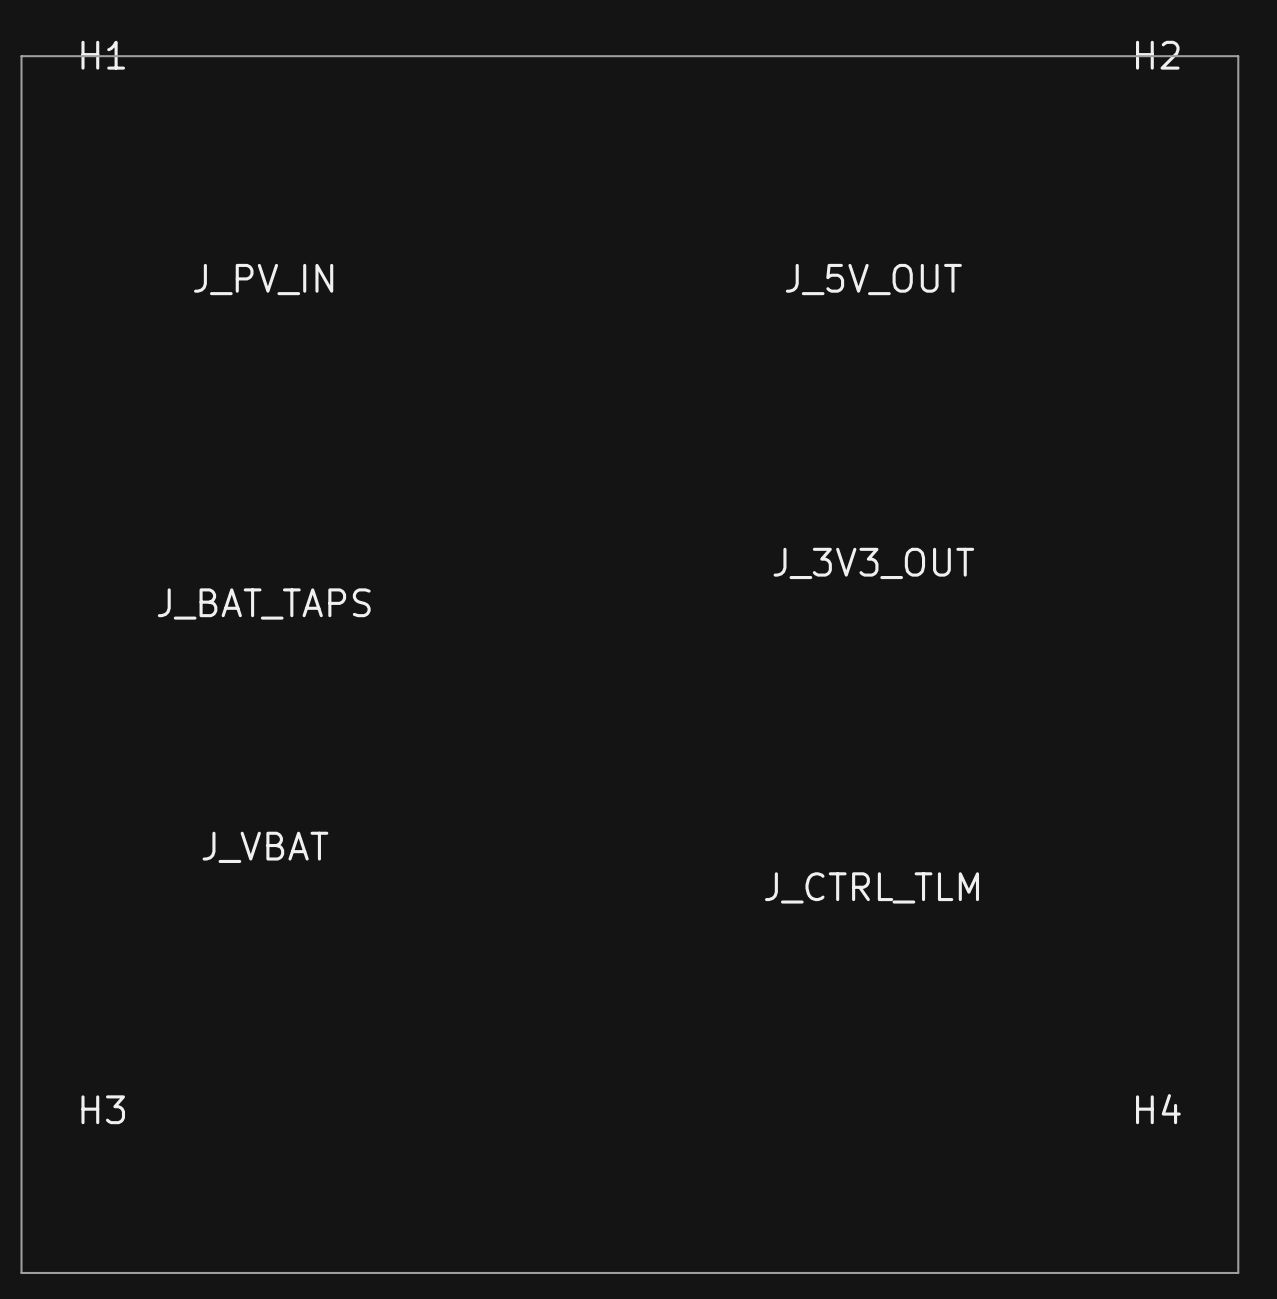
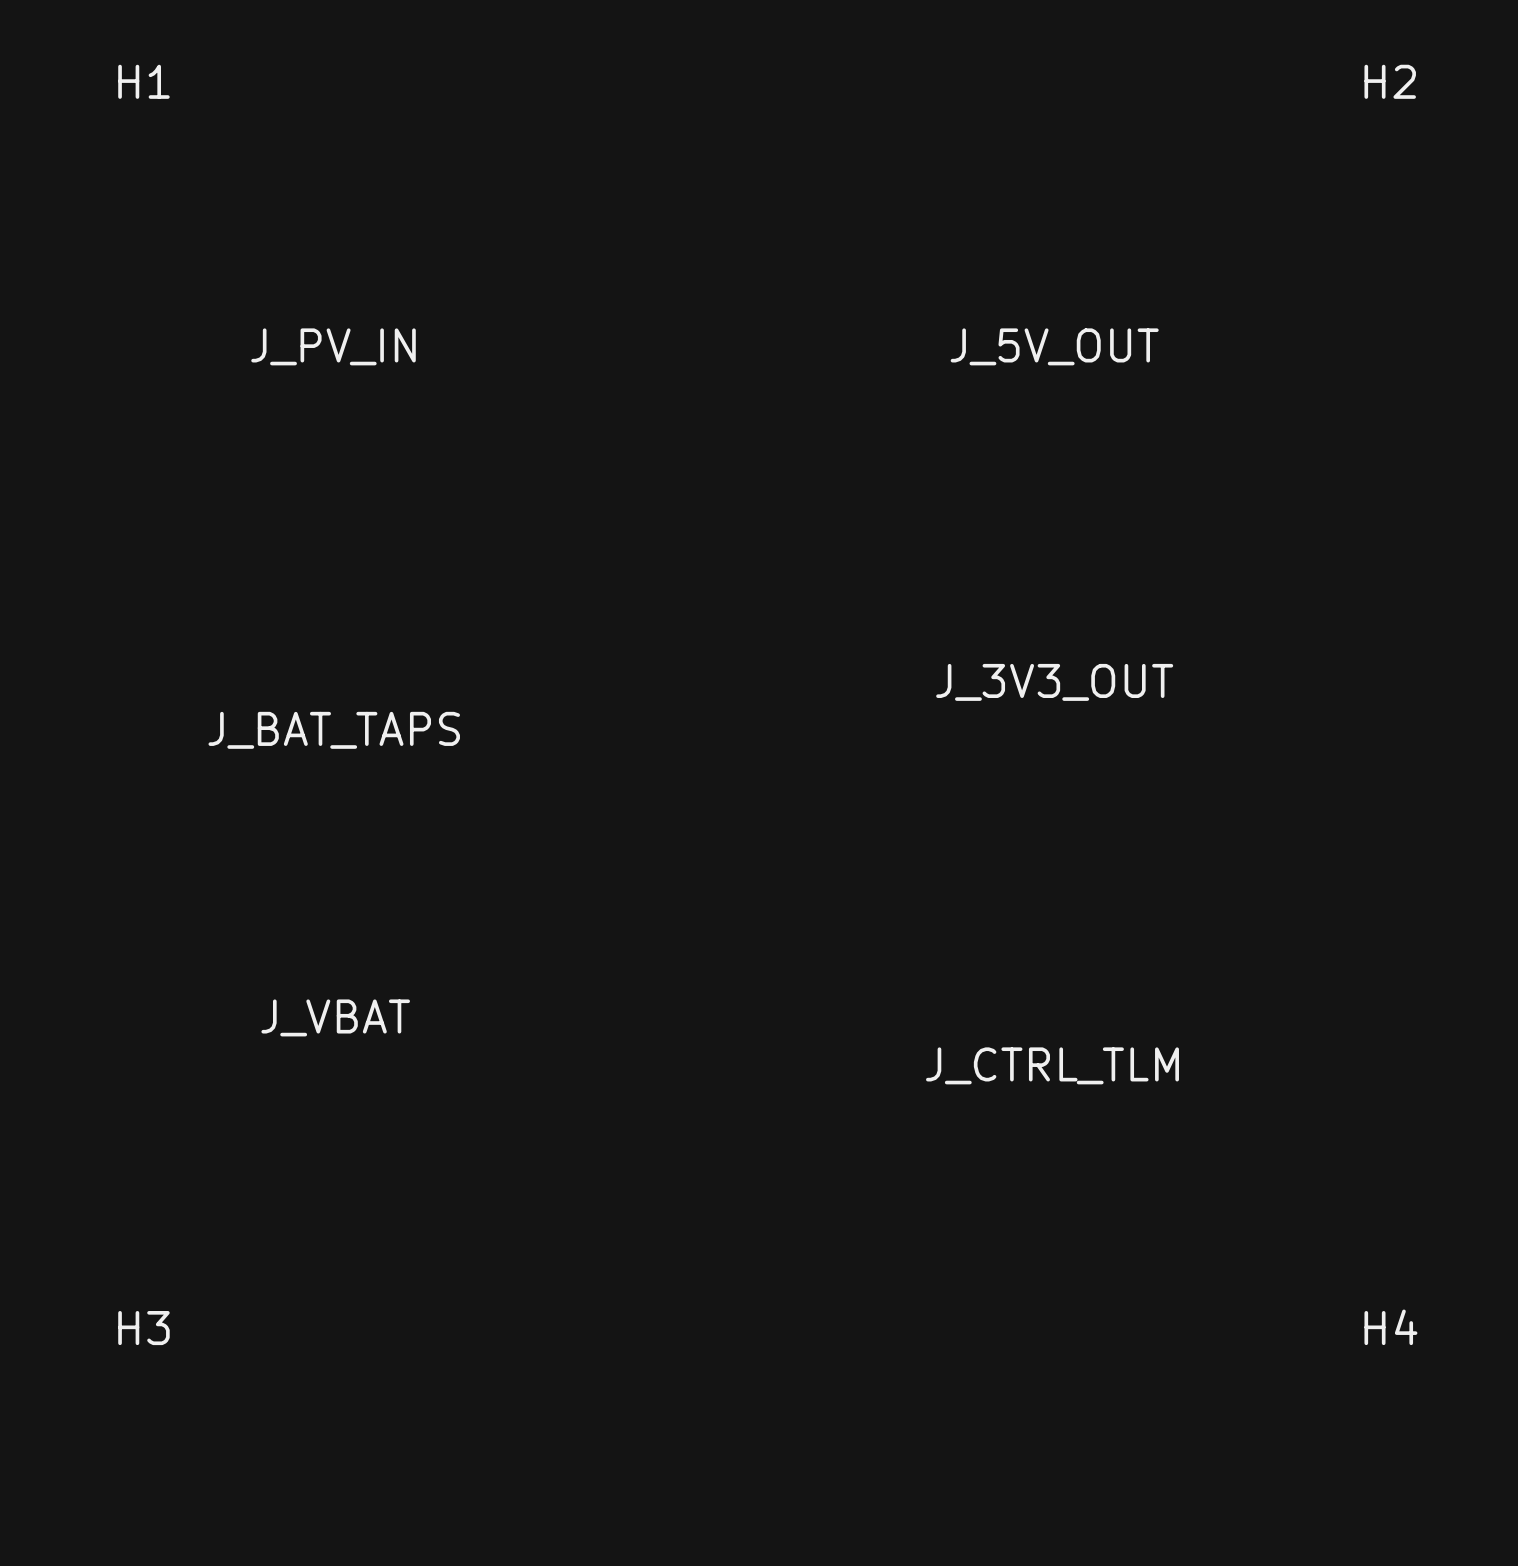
board edge: (21, 56) (1238, 56) (1238, 1272) (21, 1272) (21, 56) -> none

